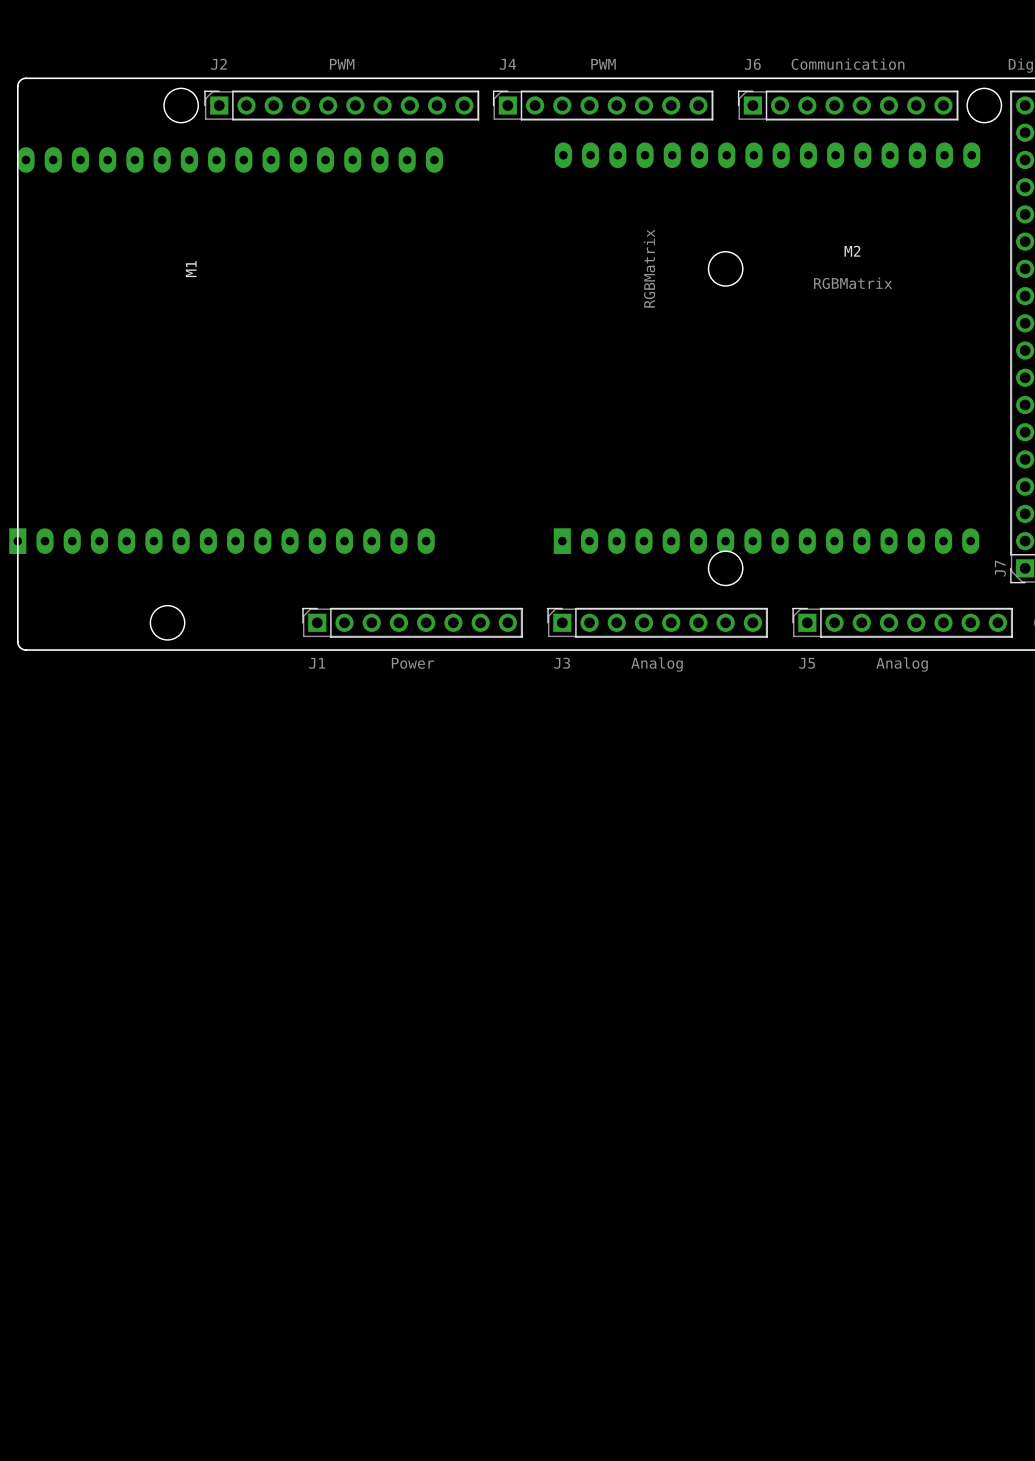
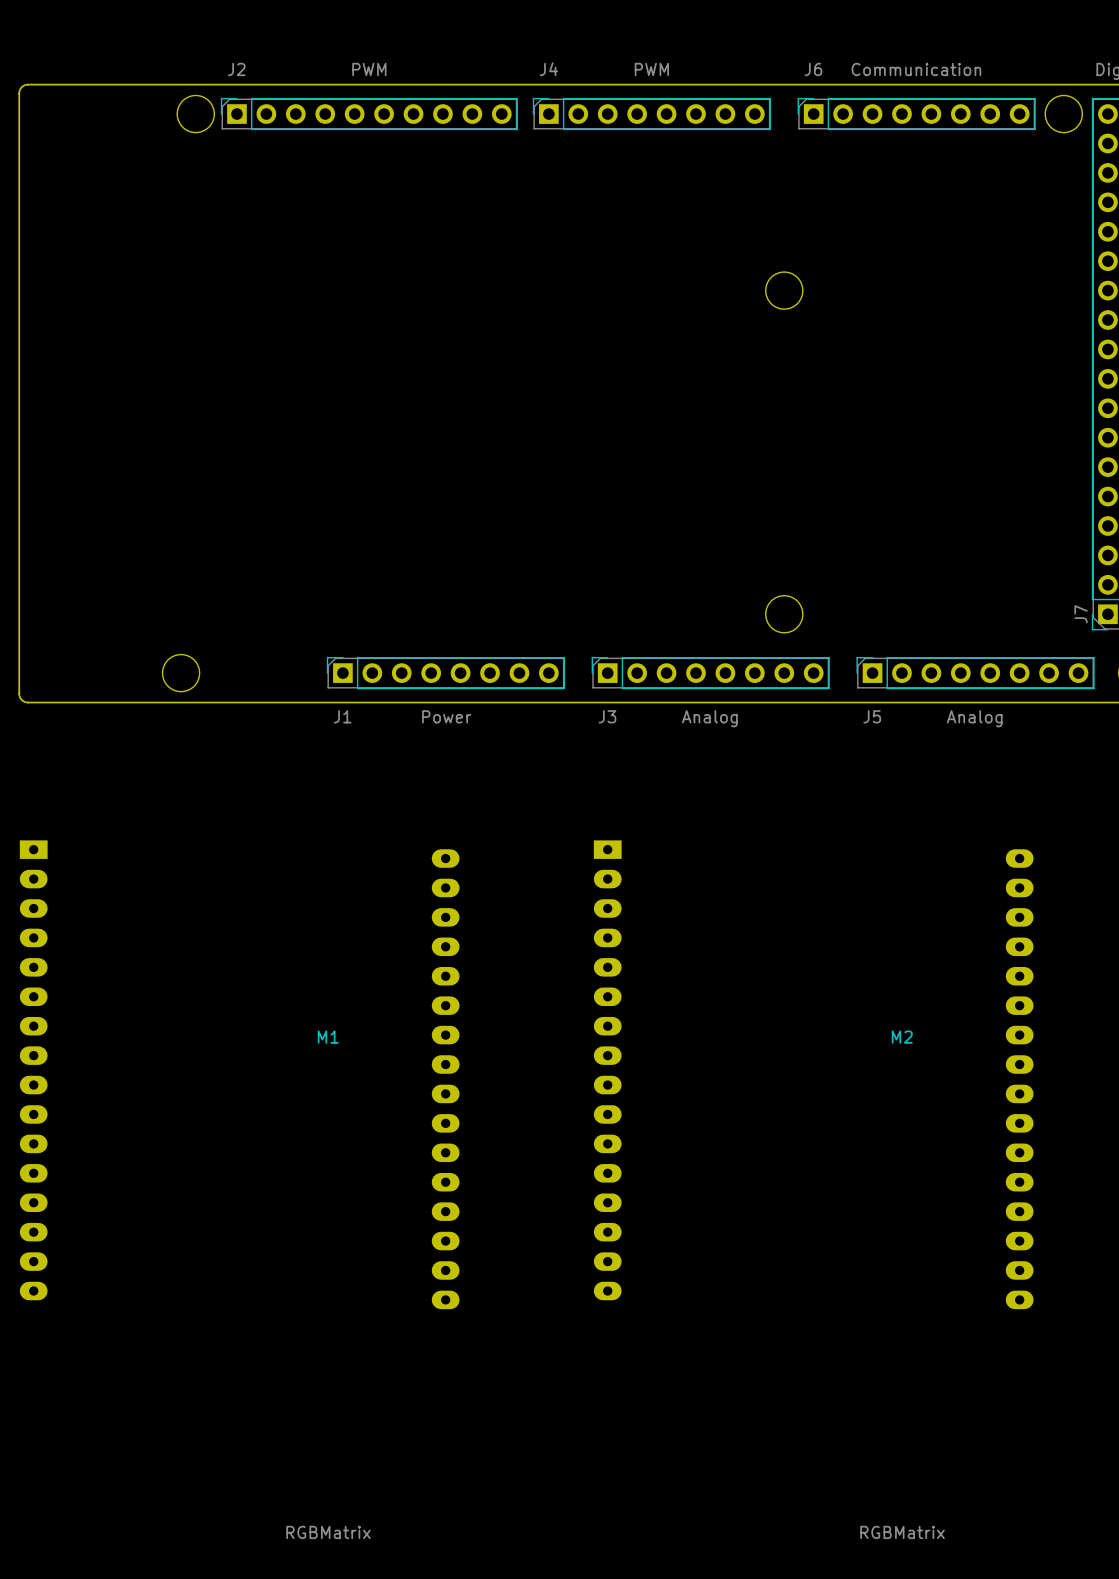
M2 footprint: [553, 142, 981, 554] -> [593, 840, 1034, 1310]
M2 name position: M2 (852, 251) -> M2 (902, 1037)
M2 value position: RGBMatrix (853, 283) -> RGBMatrix (902, 1532)
M1 rotation: 0° (226, 350) -> 90° clockwise (239, 1074)
M1 position: (226, 350) -> (239, 1074)

